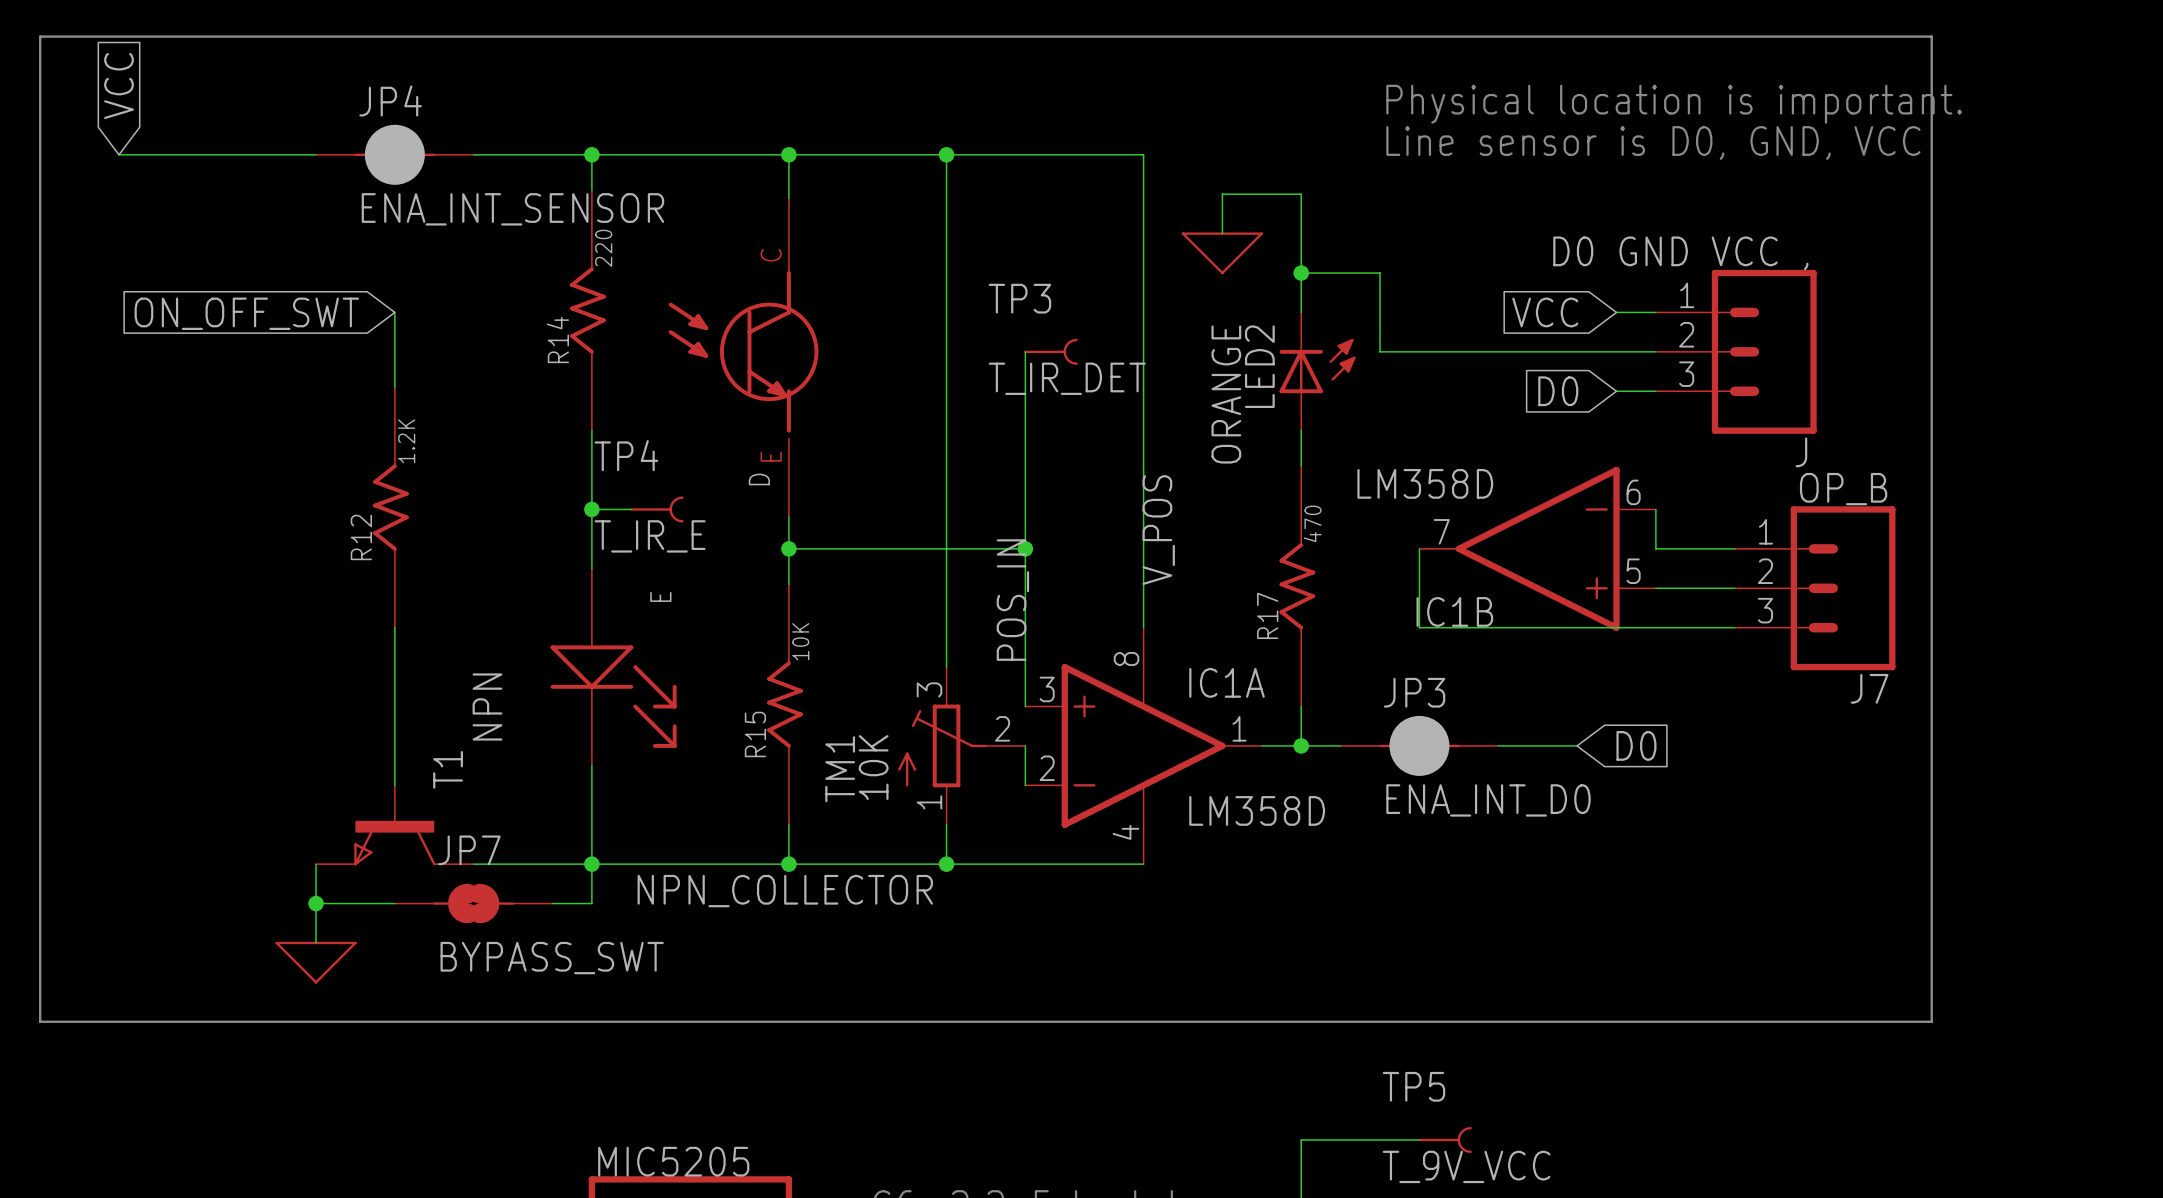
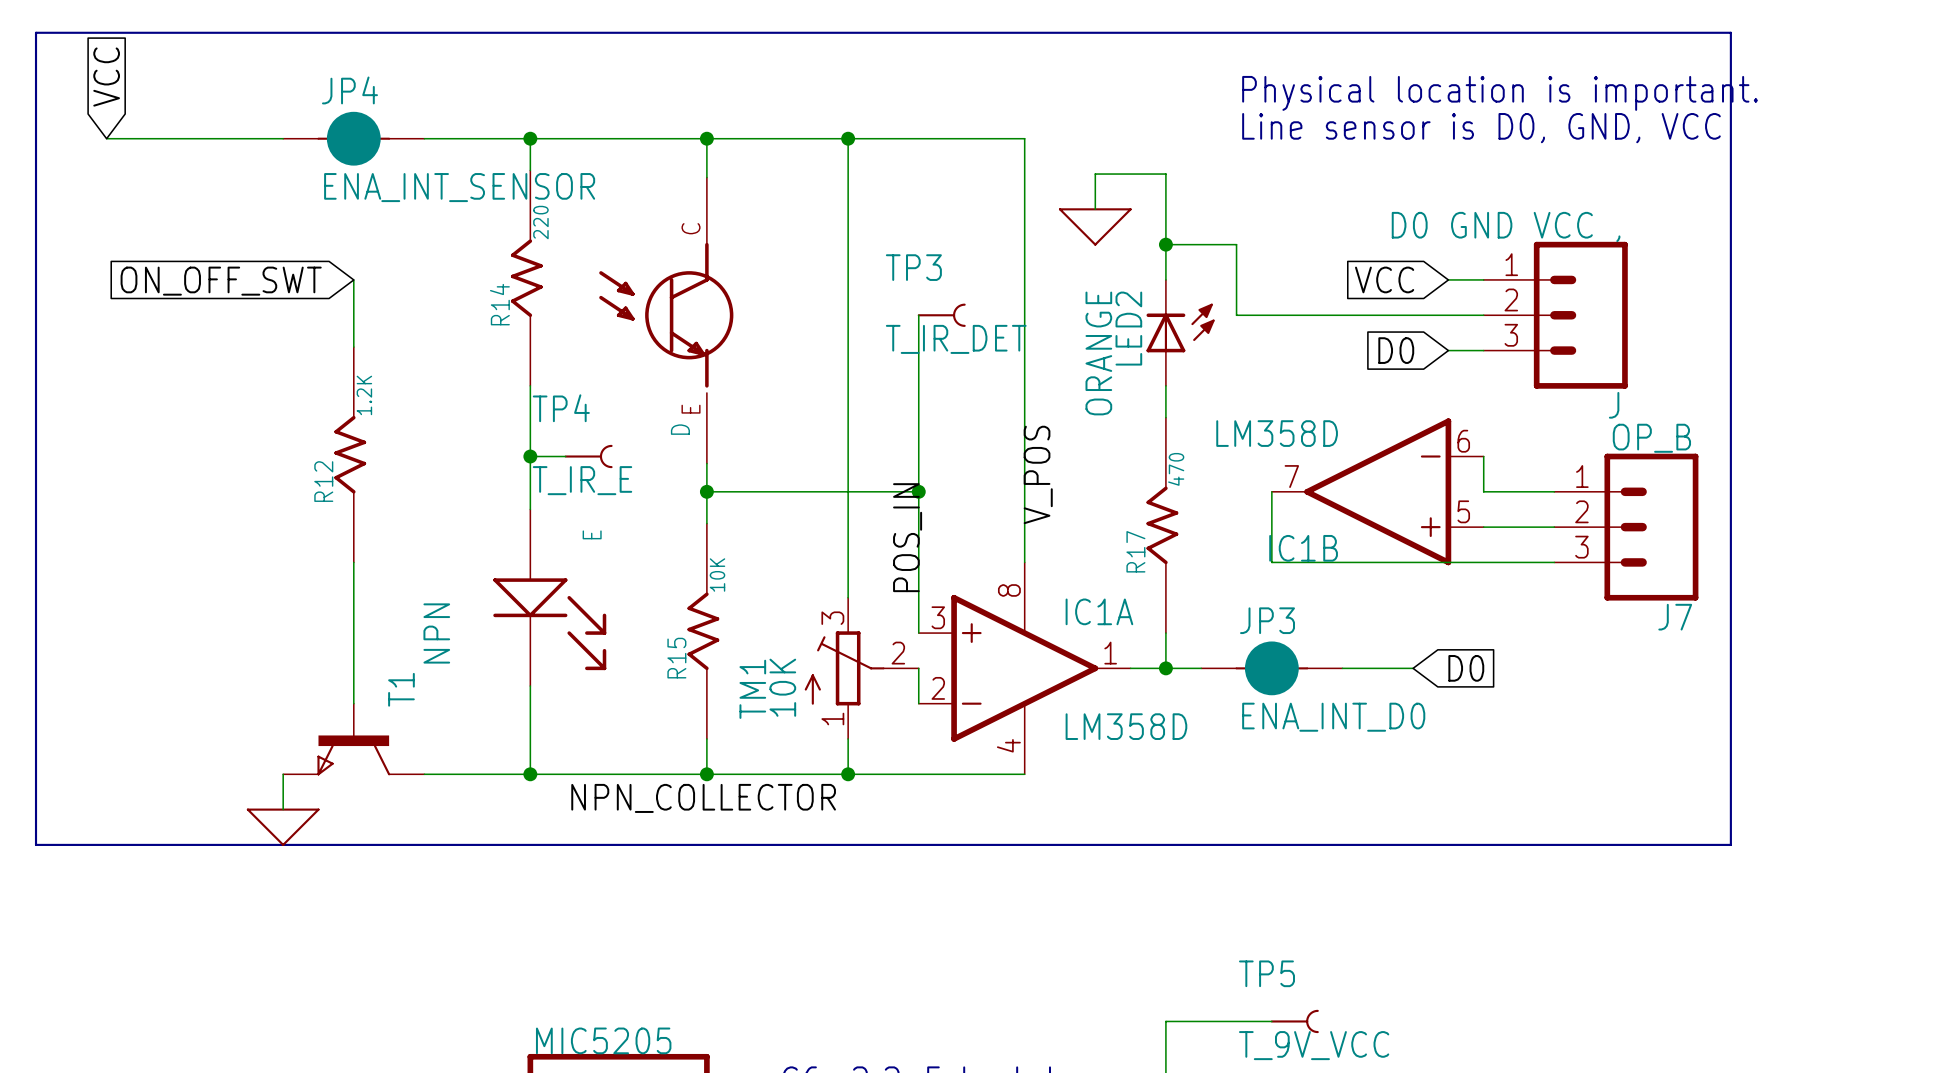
wire: (591, 864) (591, 903) (552, 903) -> none
junction: (316, 903) -> none
wire: (394, 903) (316, 903) (316, 942) -> none
JP7: BYPASS_SWT (473, 903) -> none
line: (40, 942) (40, 1021) (1931, 1021) (1931, 942) -> (36, 844) (1730, 844)
power symbol position: (316, 962) -> (283, 827)

